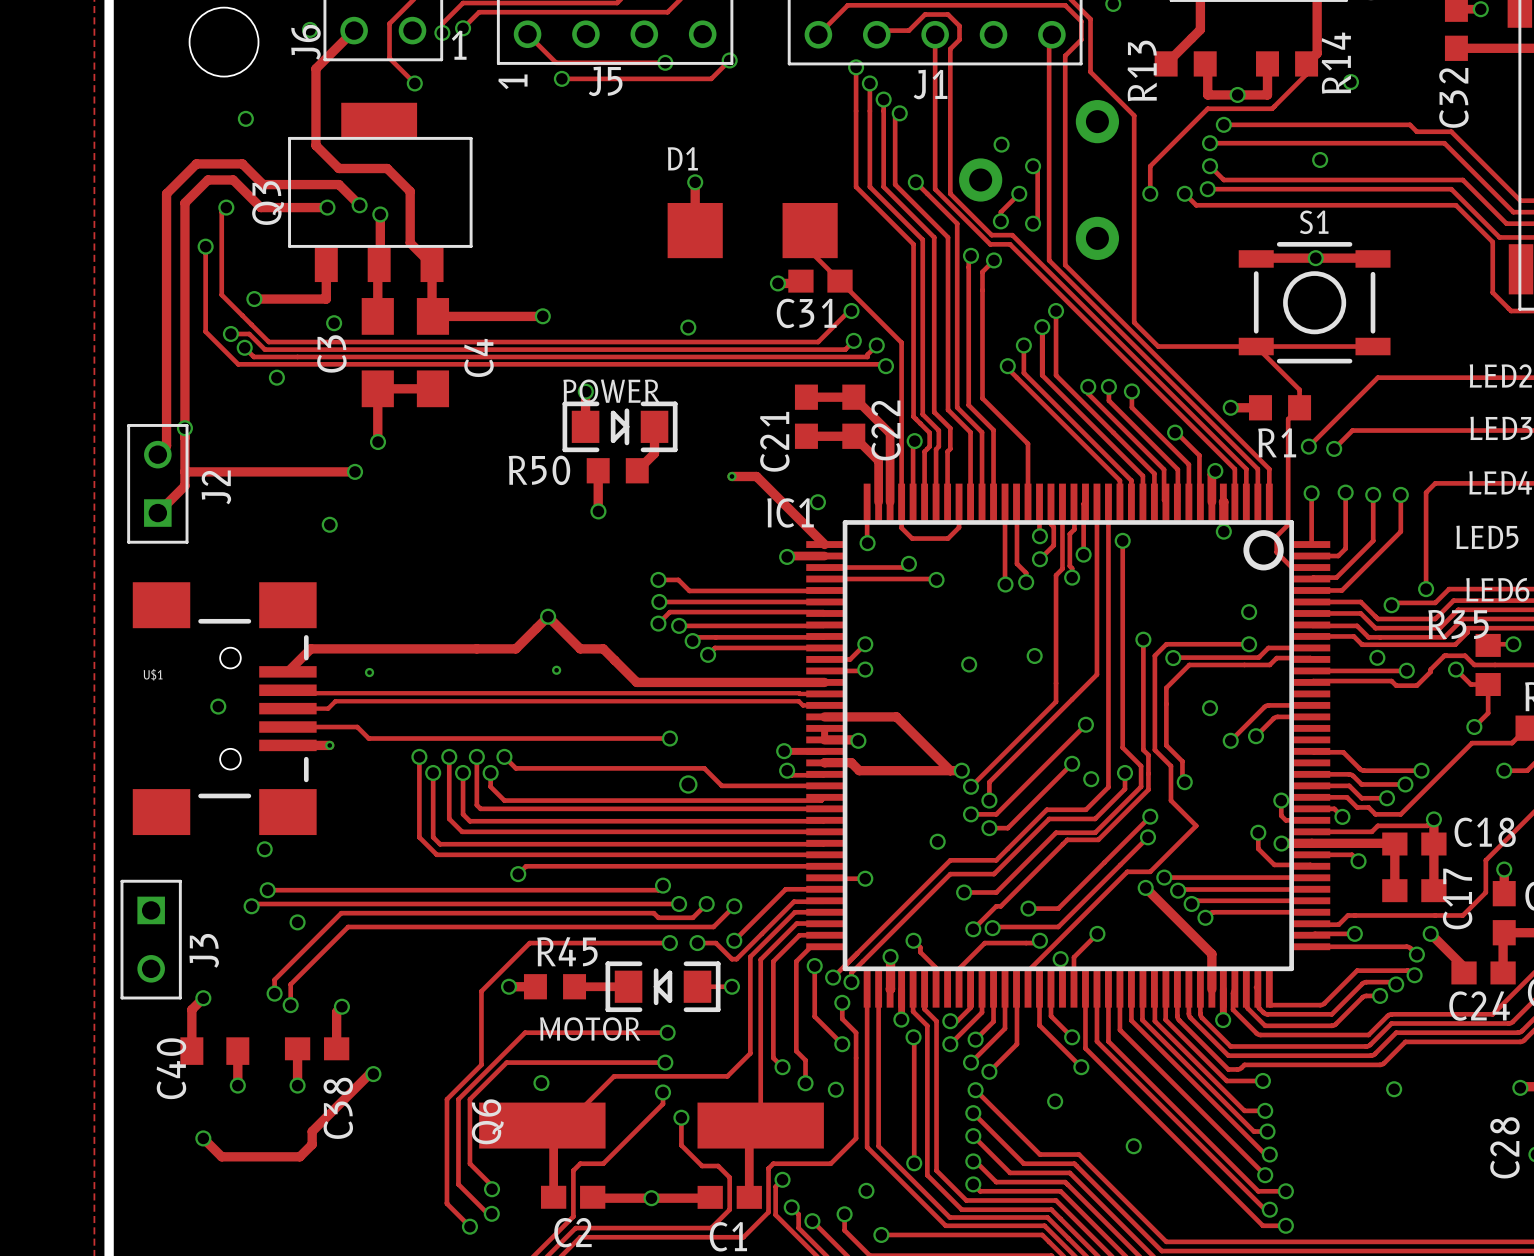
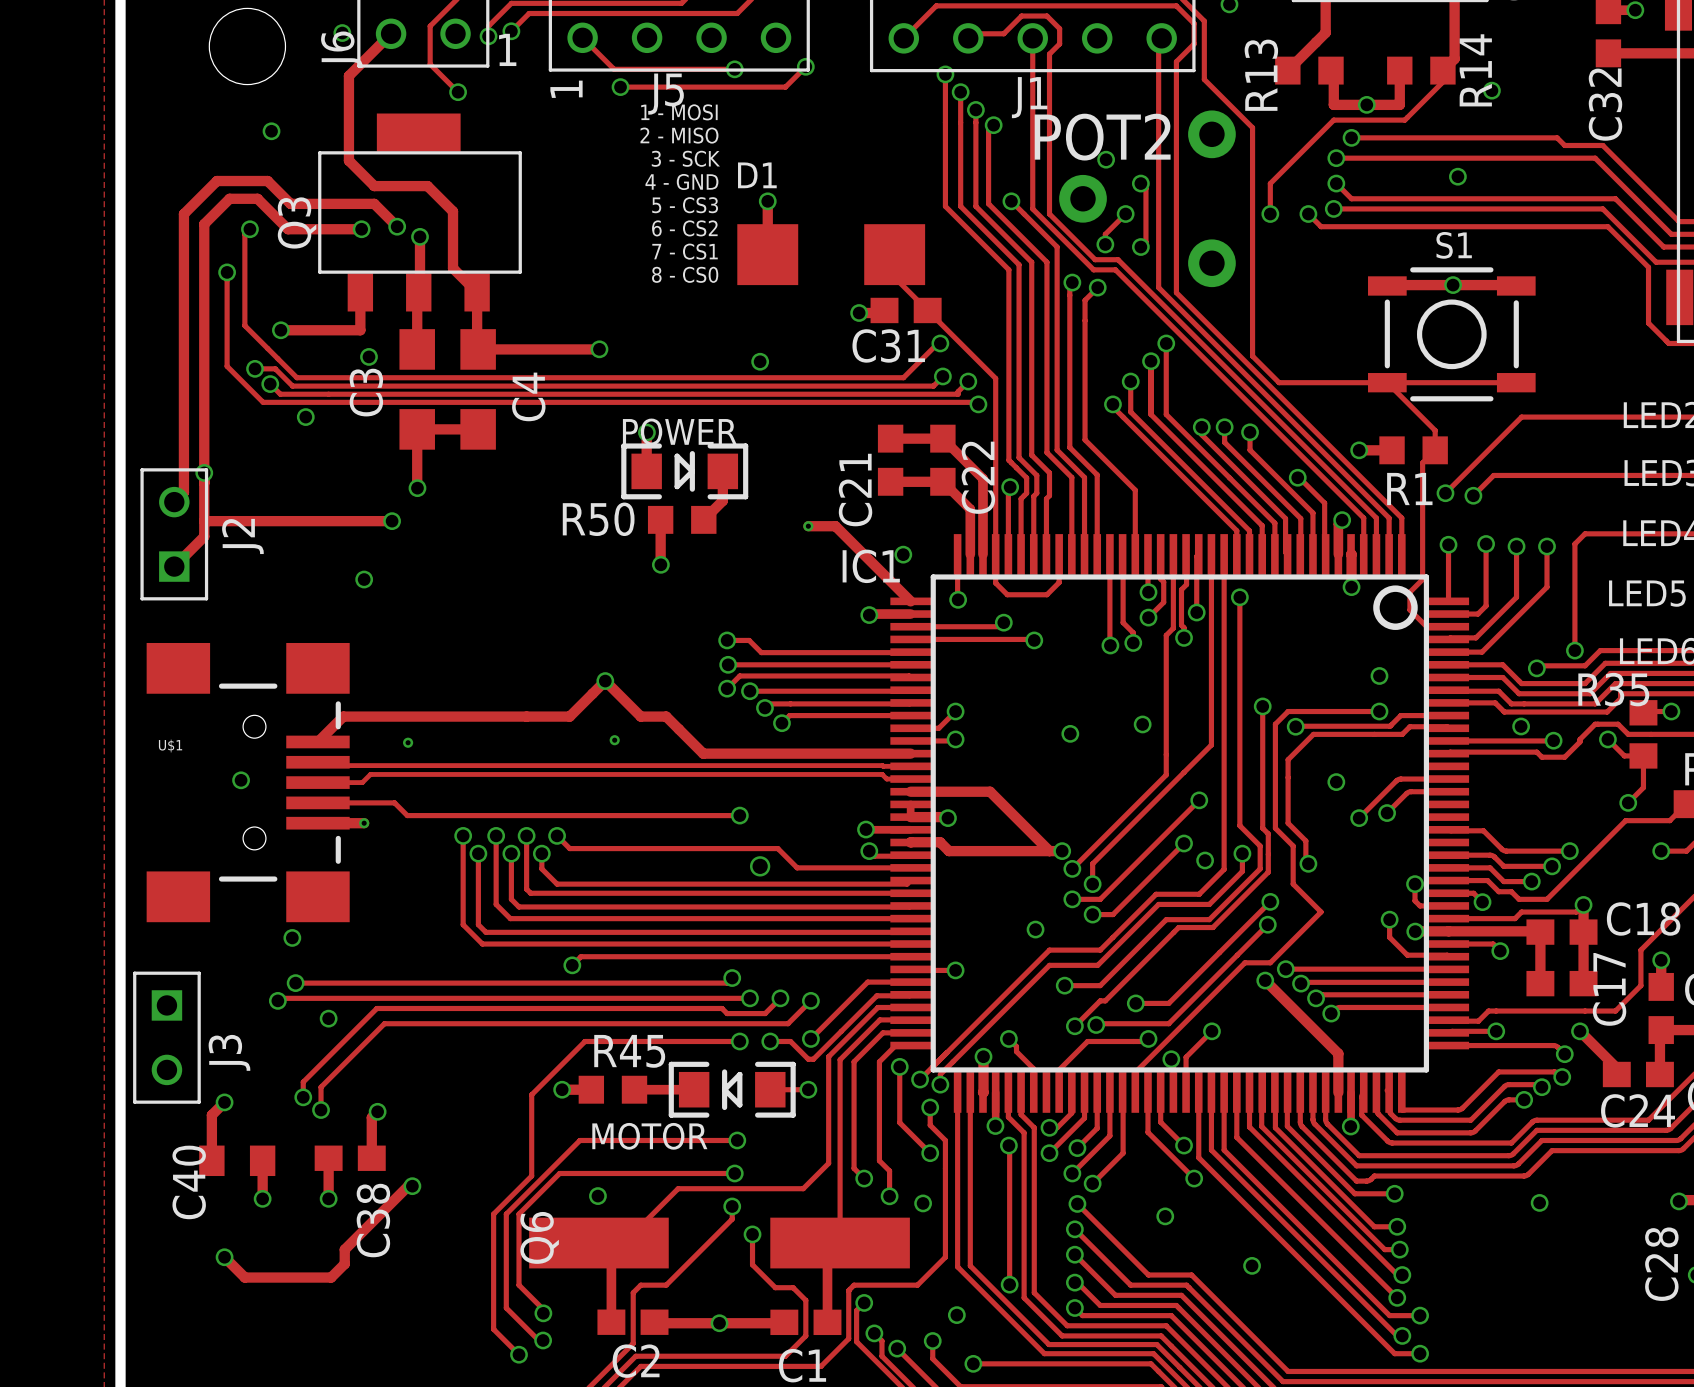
text: none -> 1 - MOSI (679, 112)
text: none -> 2 - MISO (679, 135)
text: none -> POT2 (1102, 137)
text: none -> 3 - SCK (685, 158)
text: none -> 4 - GND (681, 181)
text: none -> 5 - CS3 (685, 205)
text: none -> 6 - CS2 (684, 228)
text: none -> 7 - CS1 (685, 251)
text: none -> 8 - CS0 (685, 274)

